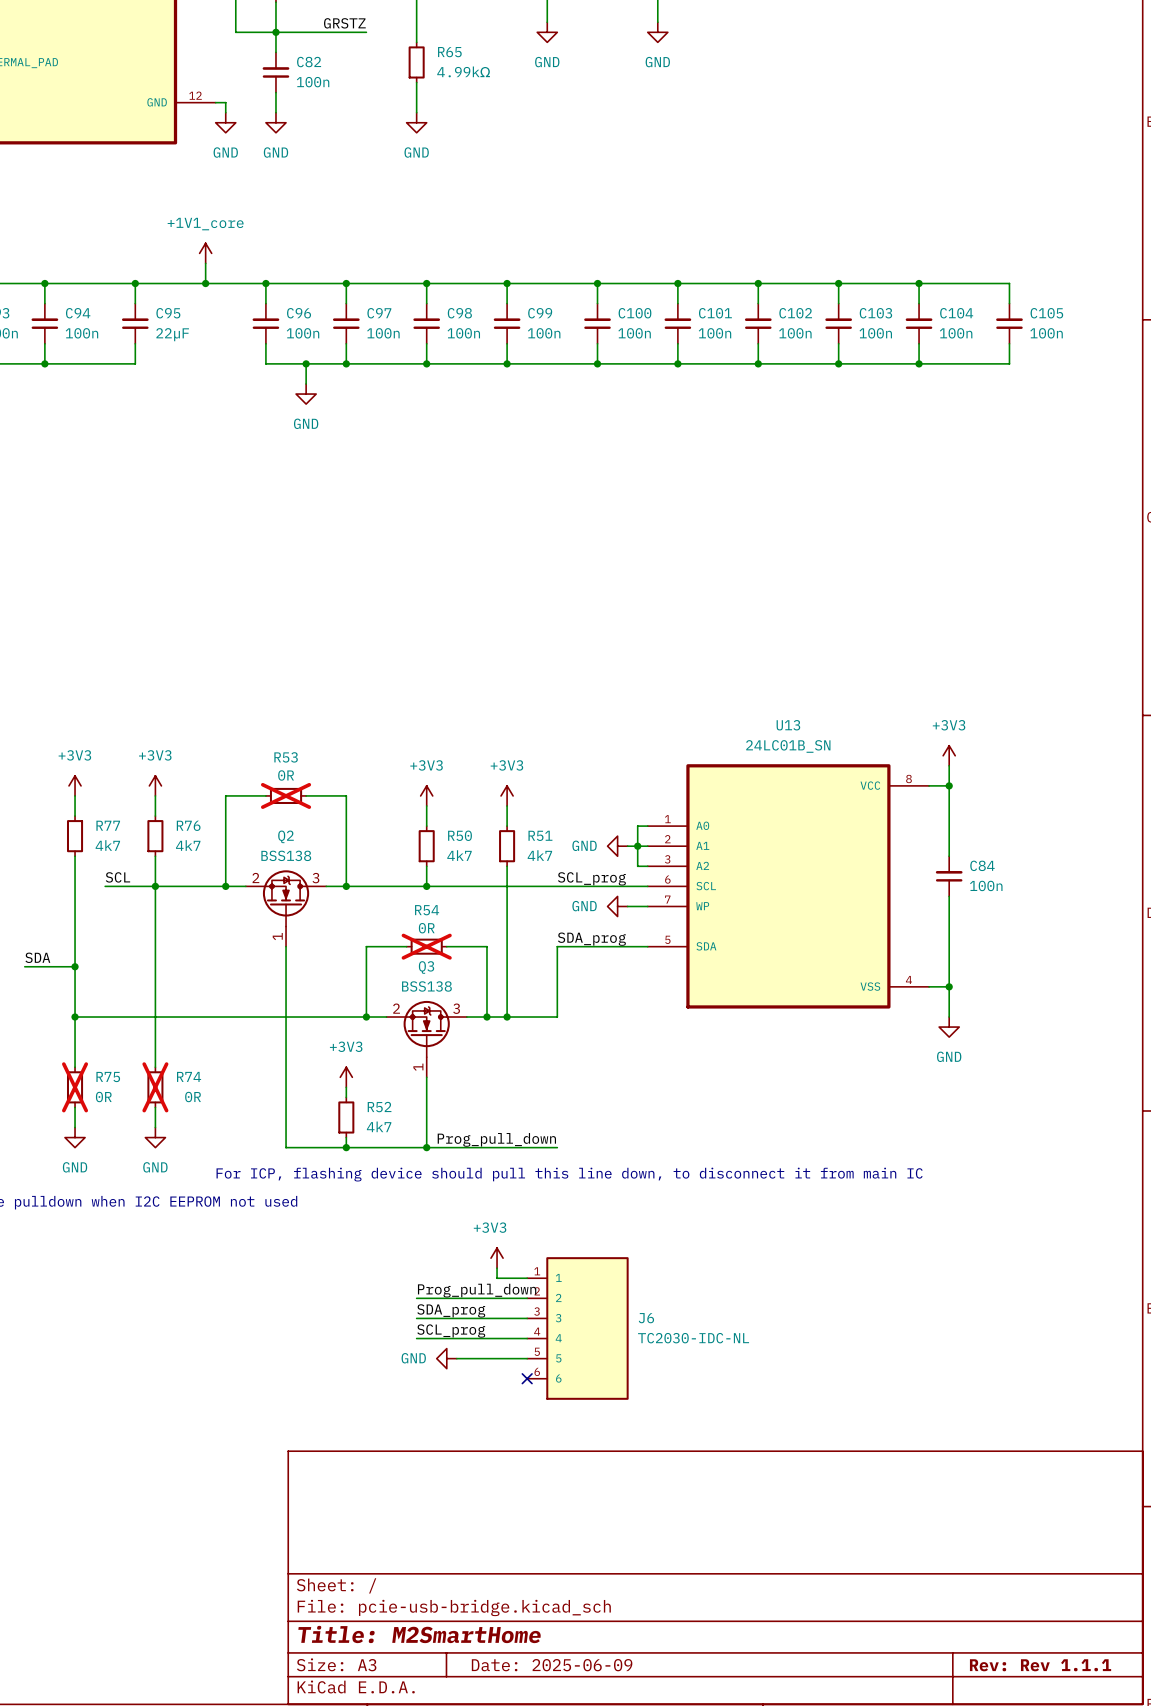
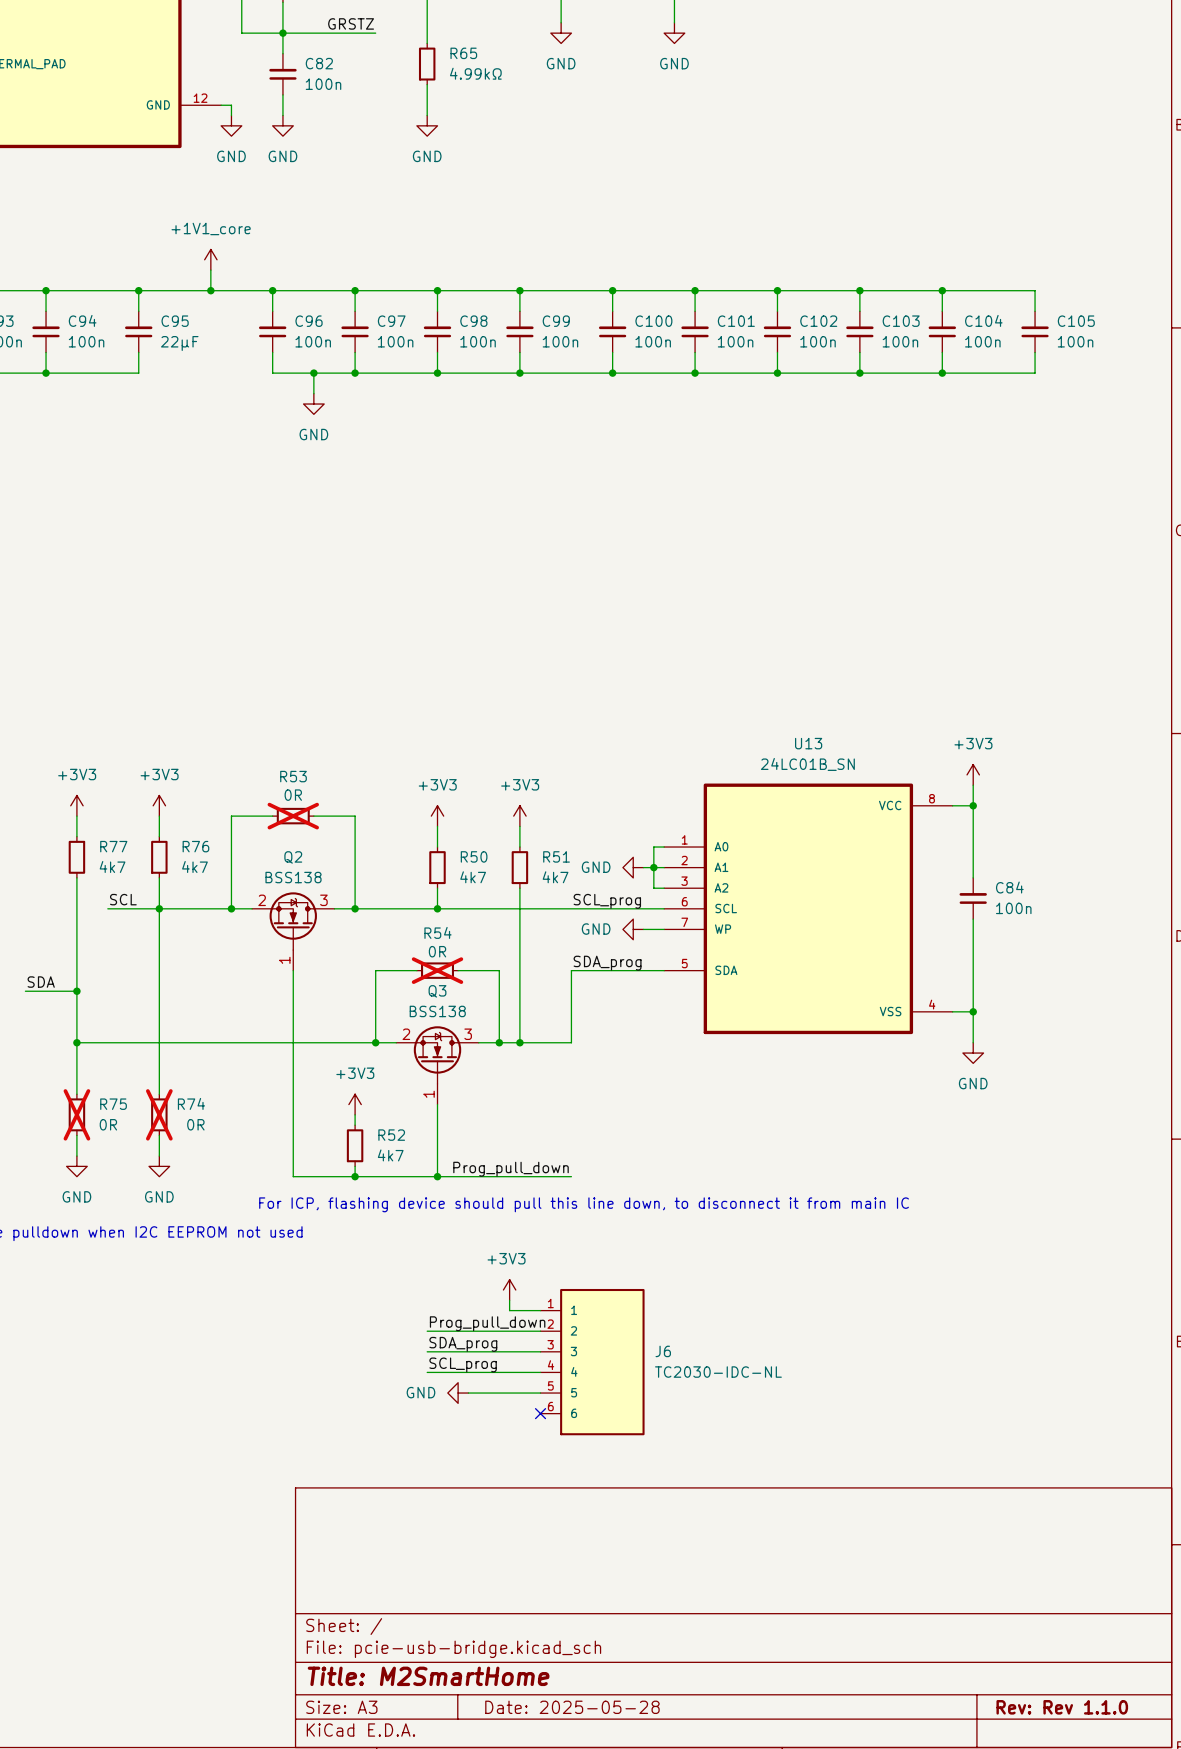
title block: Date: 2025-06-09 (552, 1665) -> Date: 2025-05-28 (572, 1707)
title block: Rev: Rev 1.1.1 (1040, 1665) -> Rev: Rev 1.1.0 (1062, 1707)

